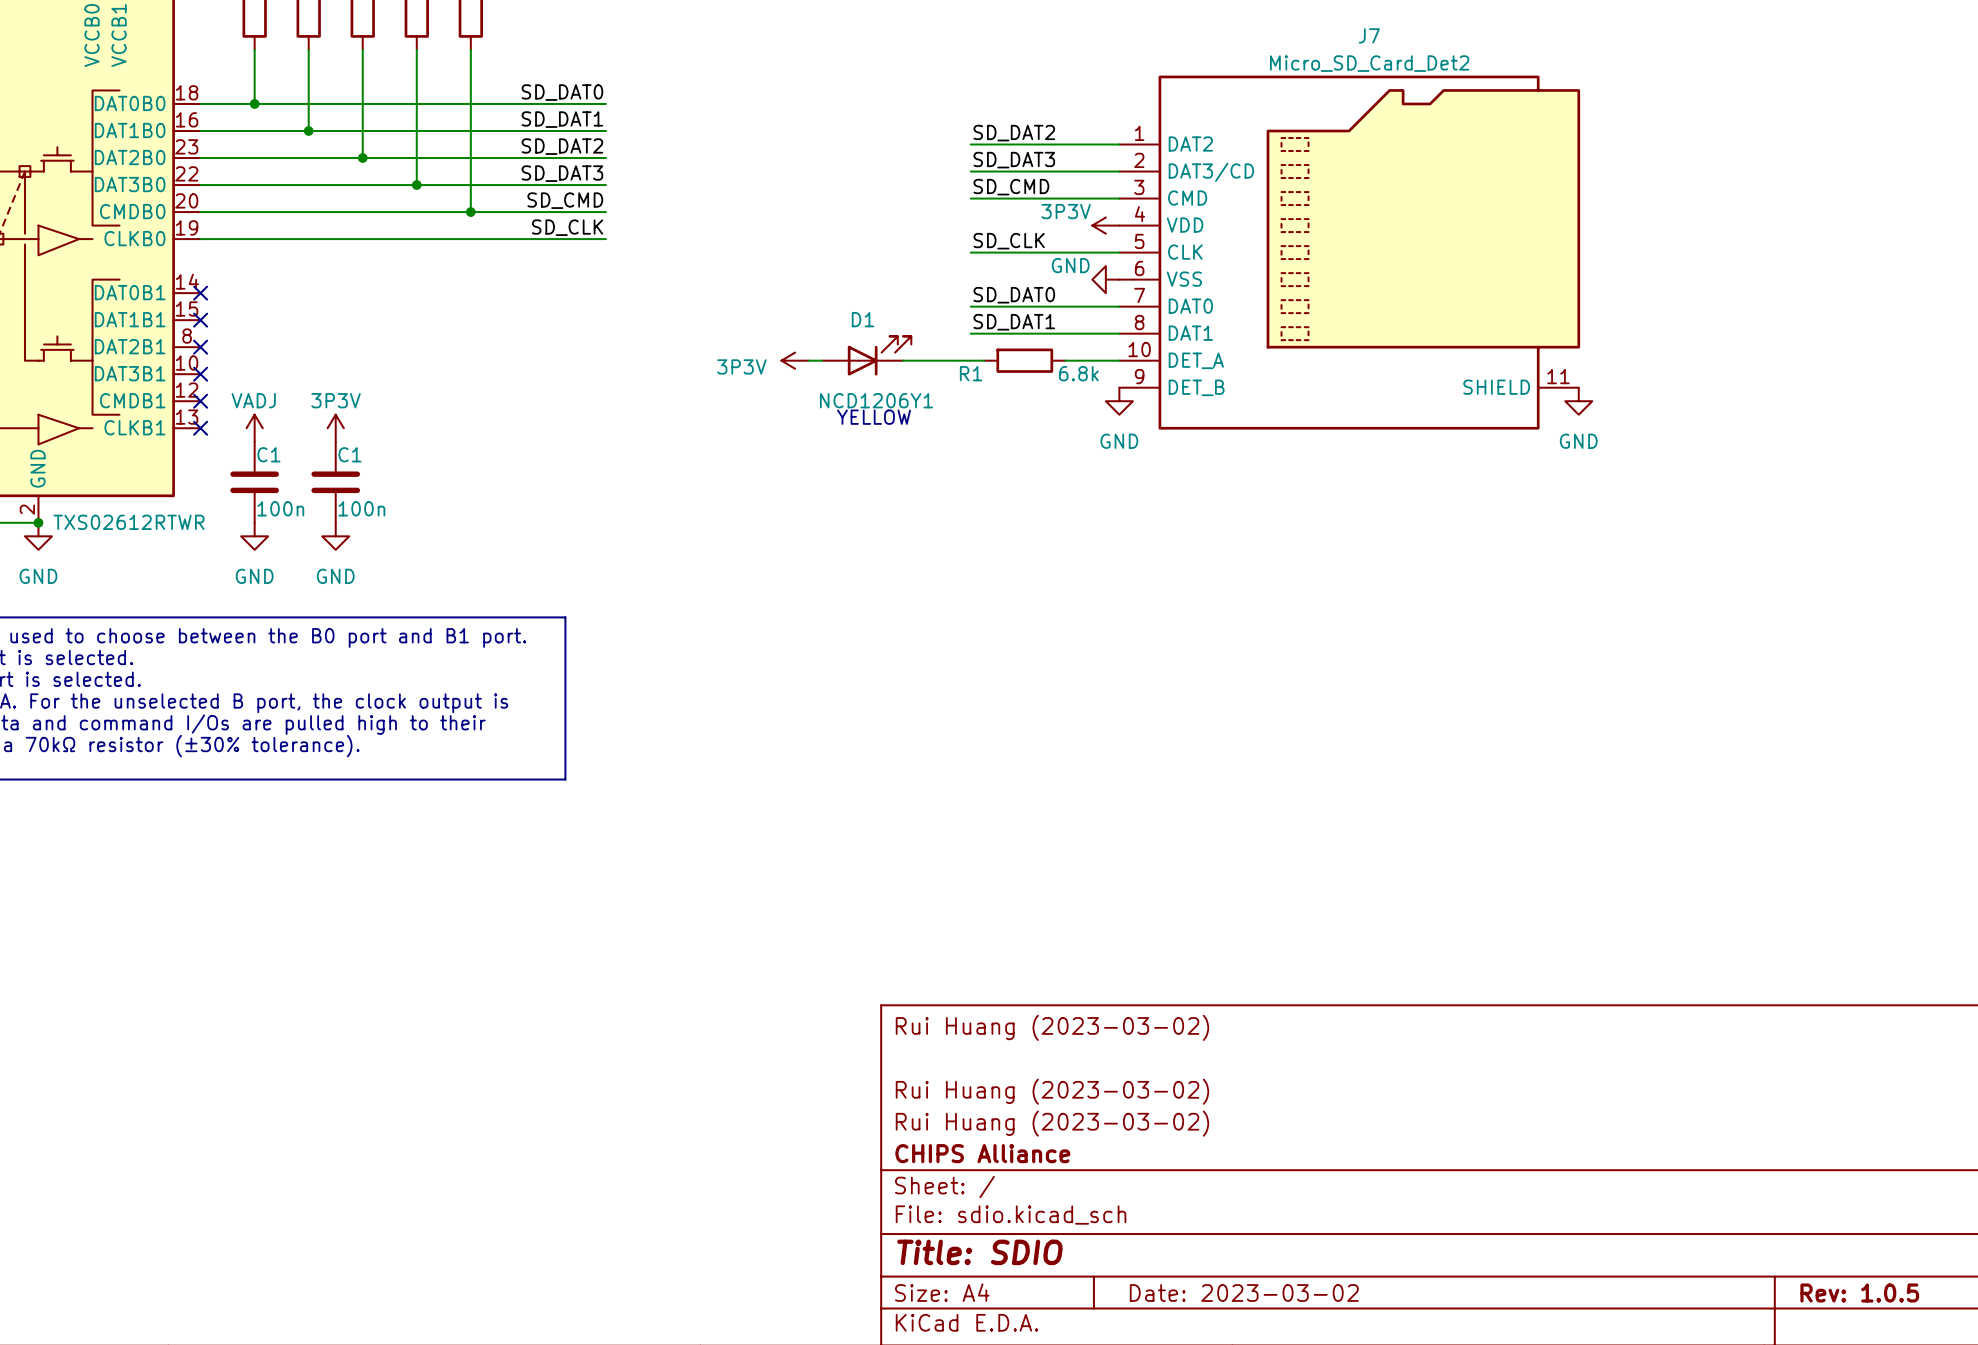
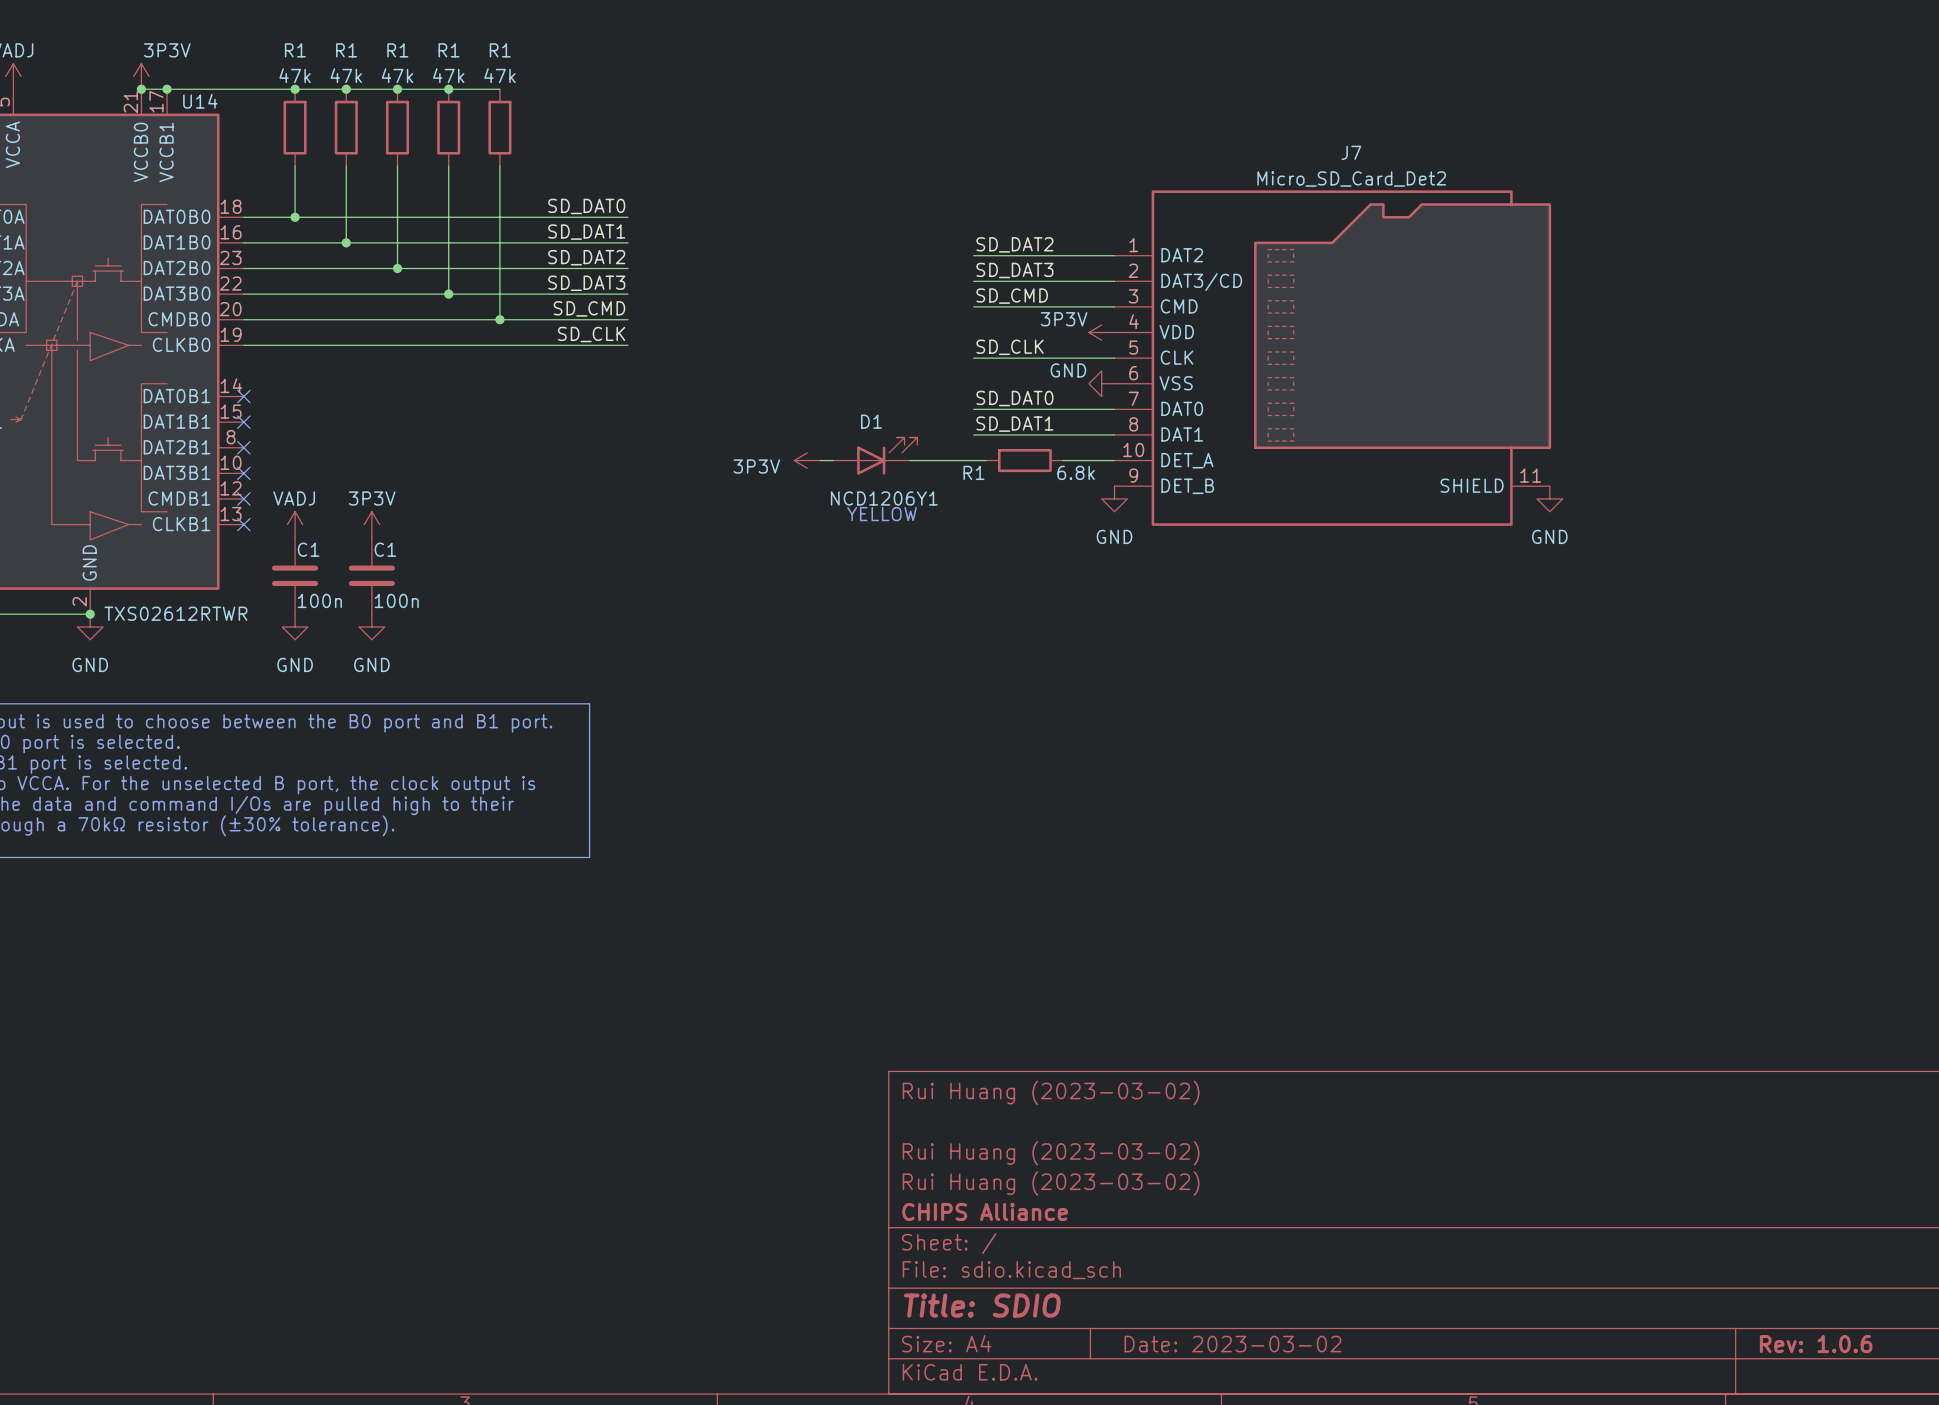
title block: Rev: 1.0.5 (1859, 1293) -> Rev: 1.0.6 (1816, 1344)

